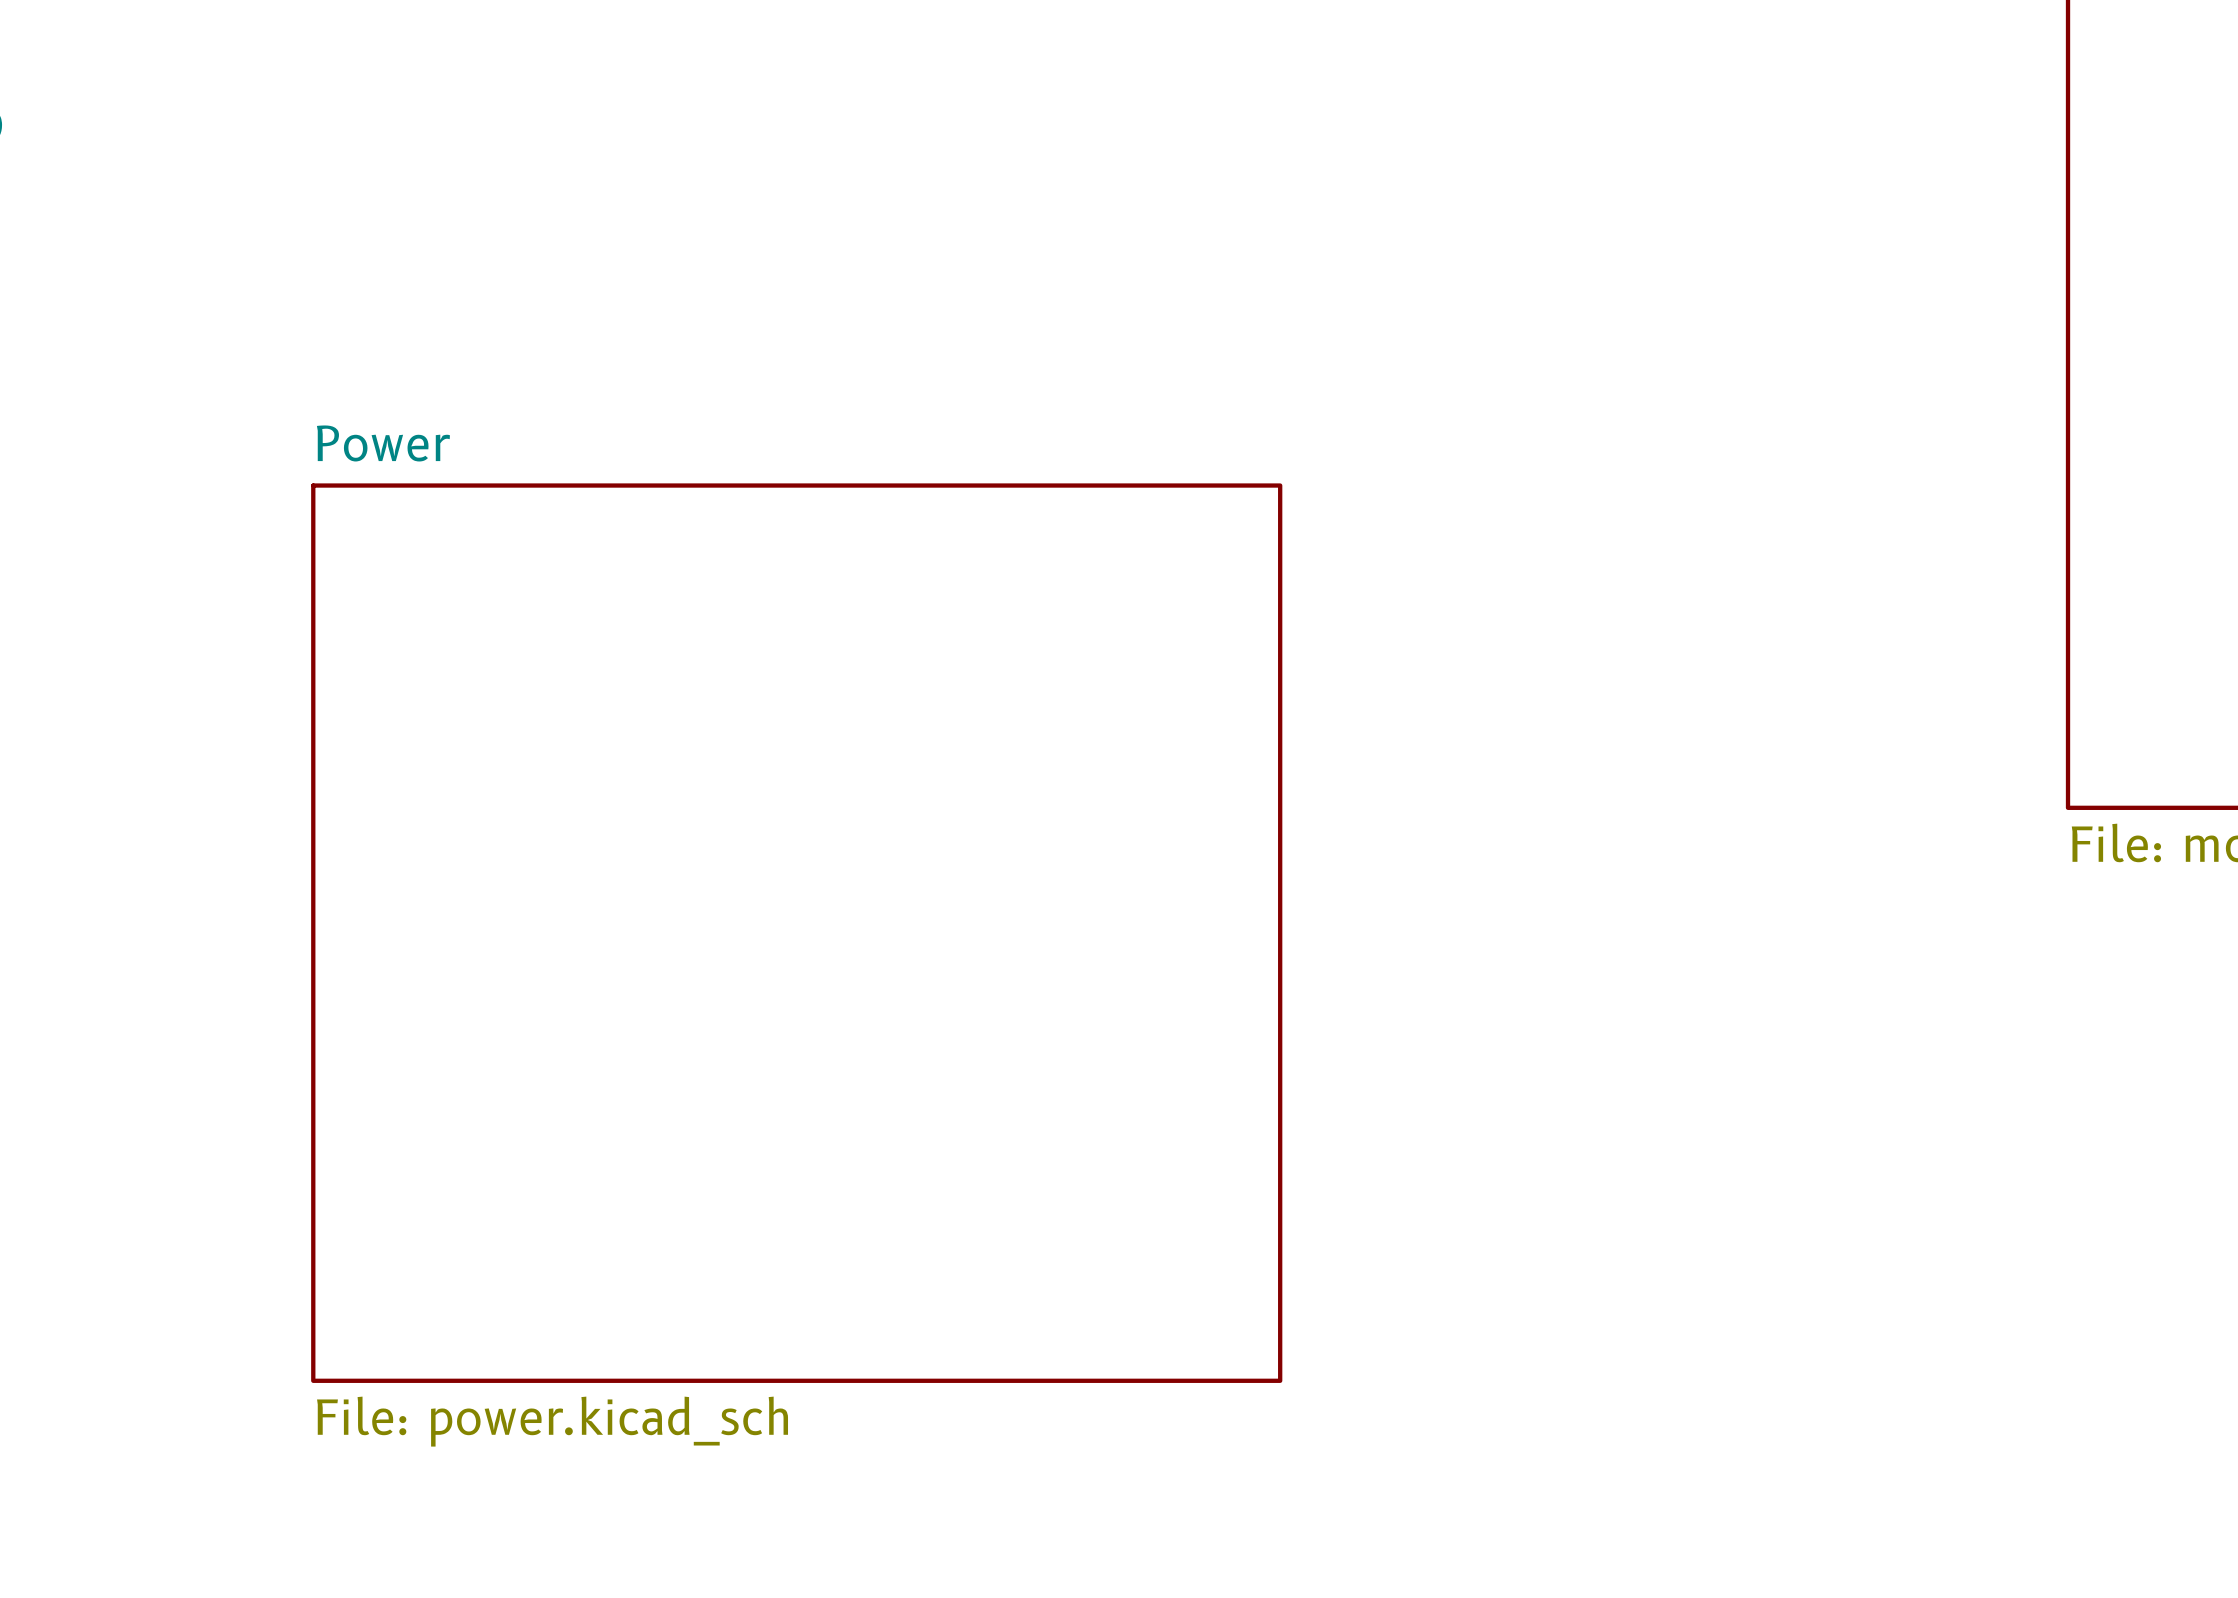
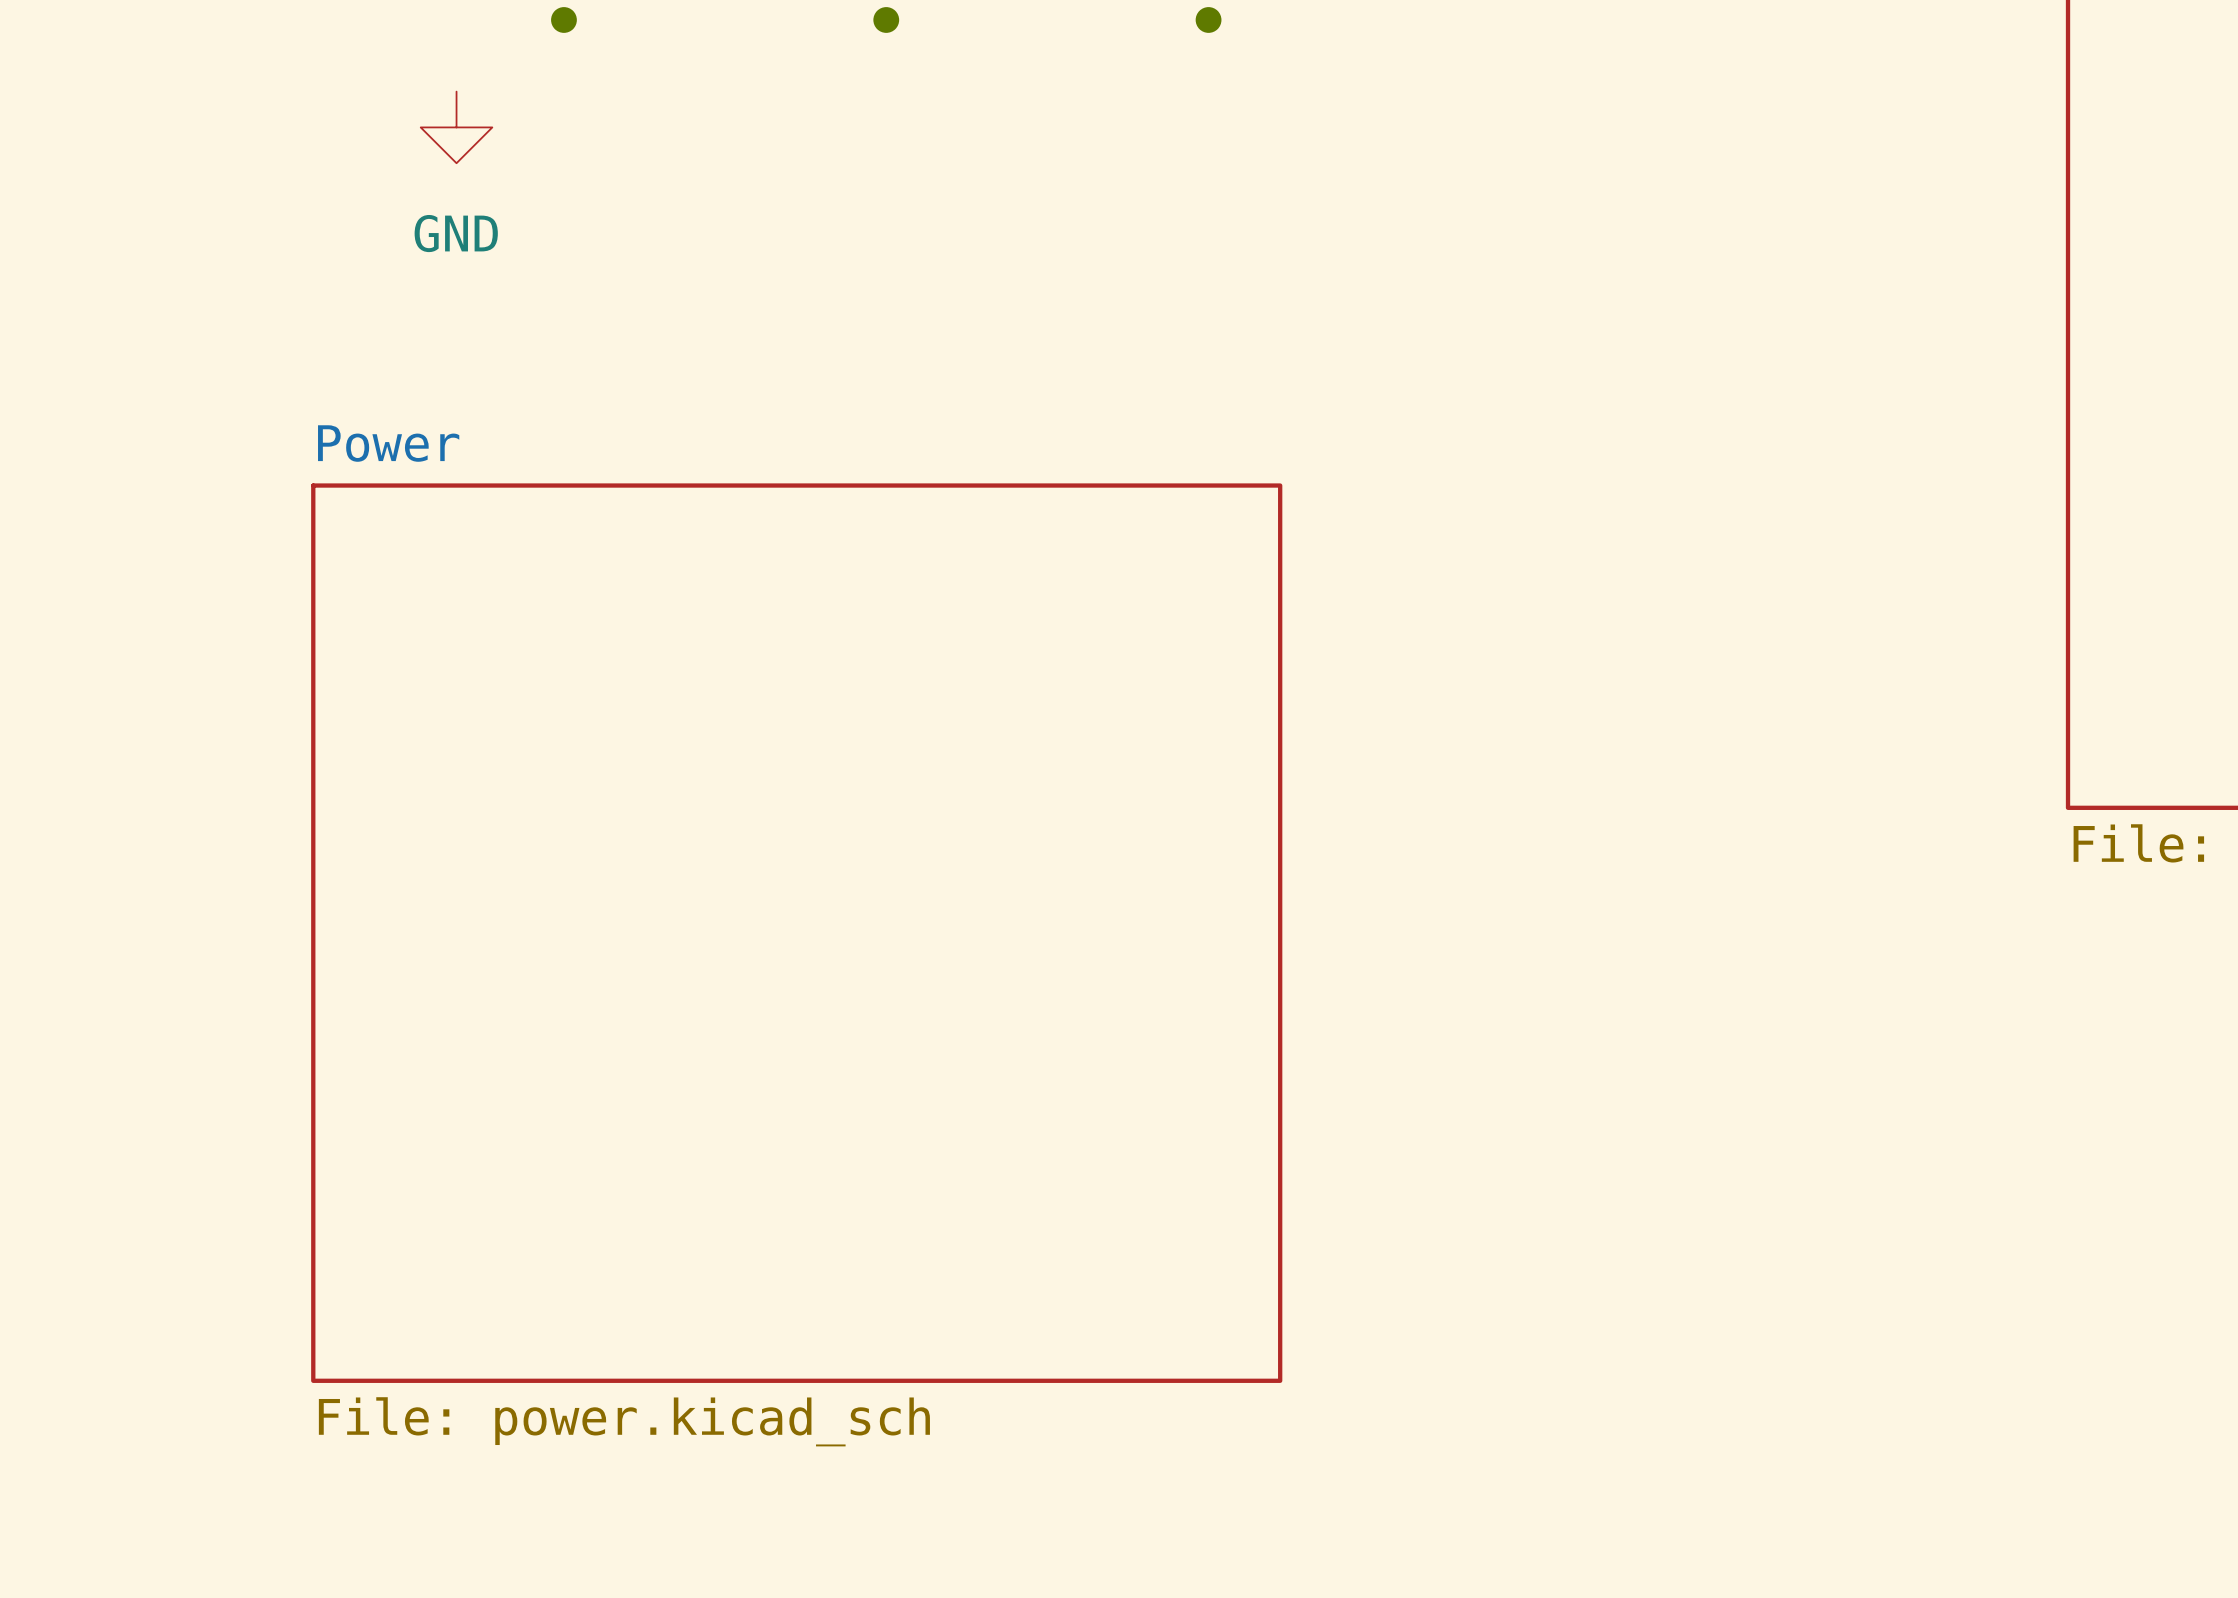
junction: none -> (563, 19)
junction: none -> (886, 19)
junction: none -> (1208, 19)
power symbol: none -> GND (456, 127)

